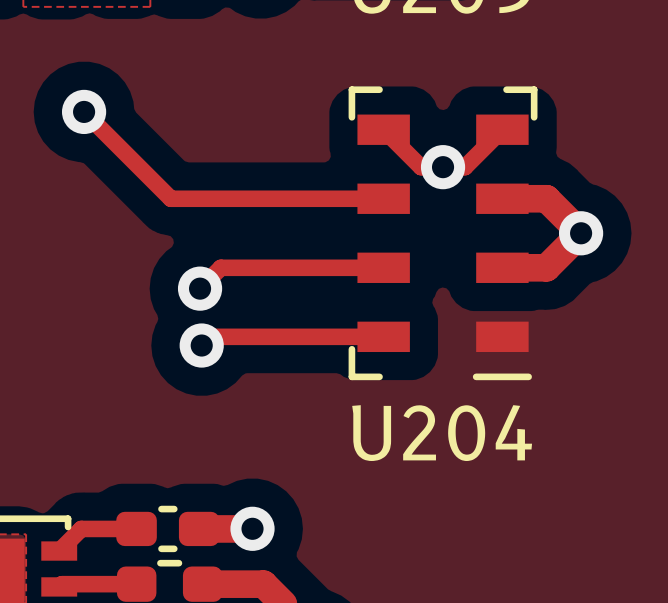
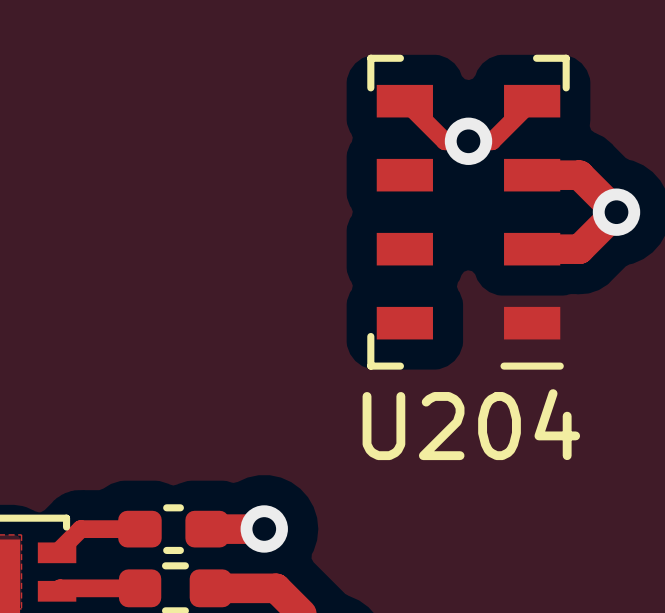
track: (84, 111) (170, 198) (383, 198) -> none
via: (84, 111) -> none
track: (383, 267) (220, 267) (200, 288) -> none
via: (200, 288) -> none
track: (383, 336) (210, 336) (201, 345) -> none
via: (201, 345) -> none

